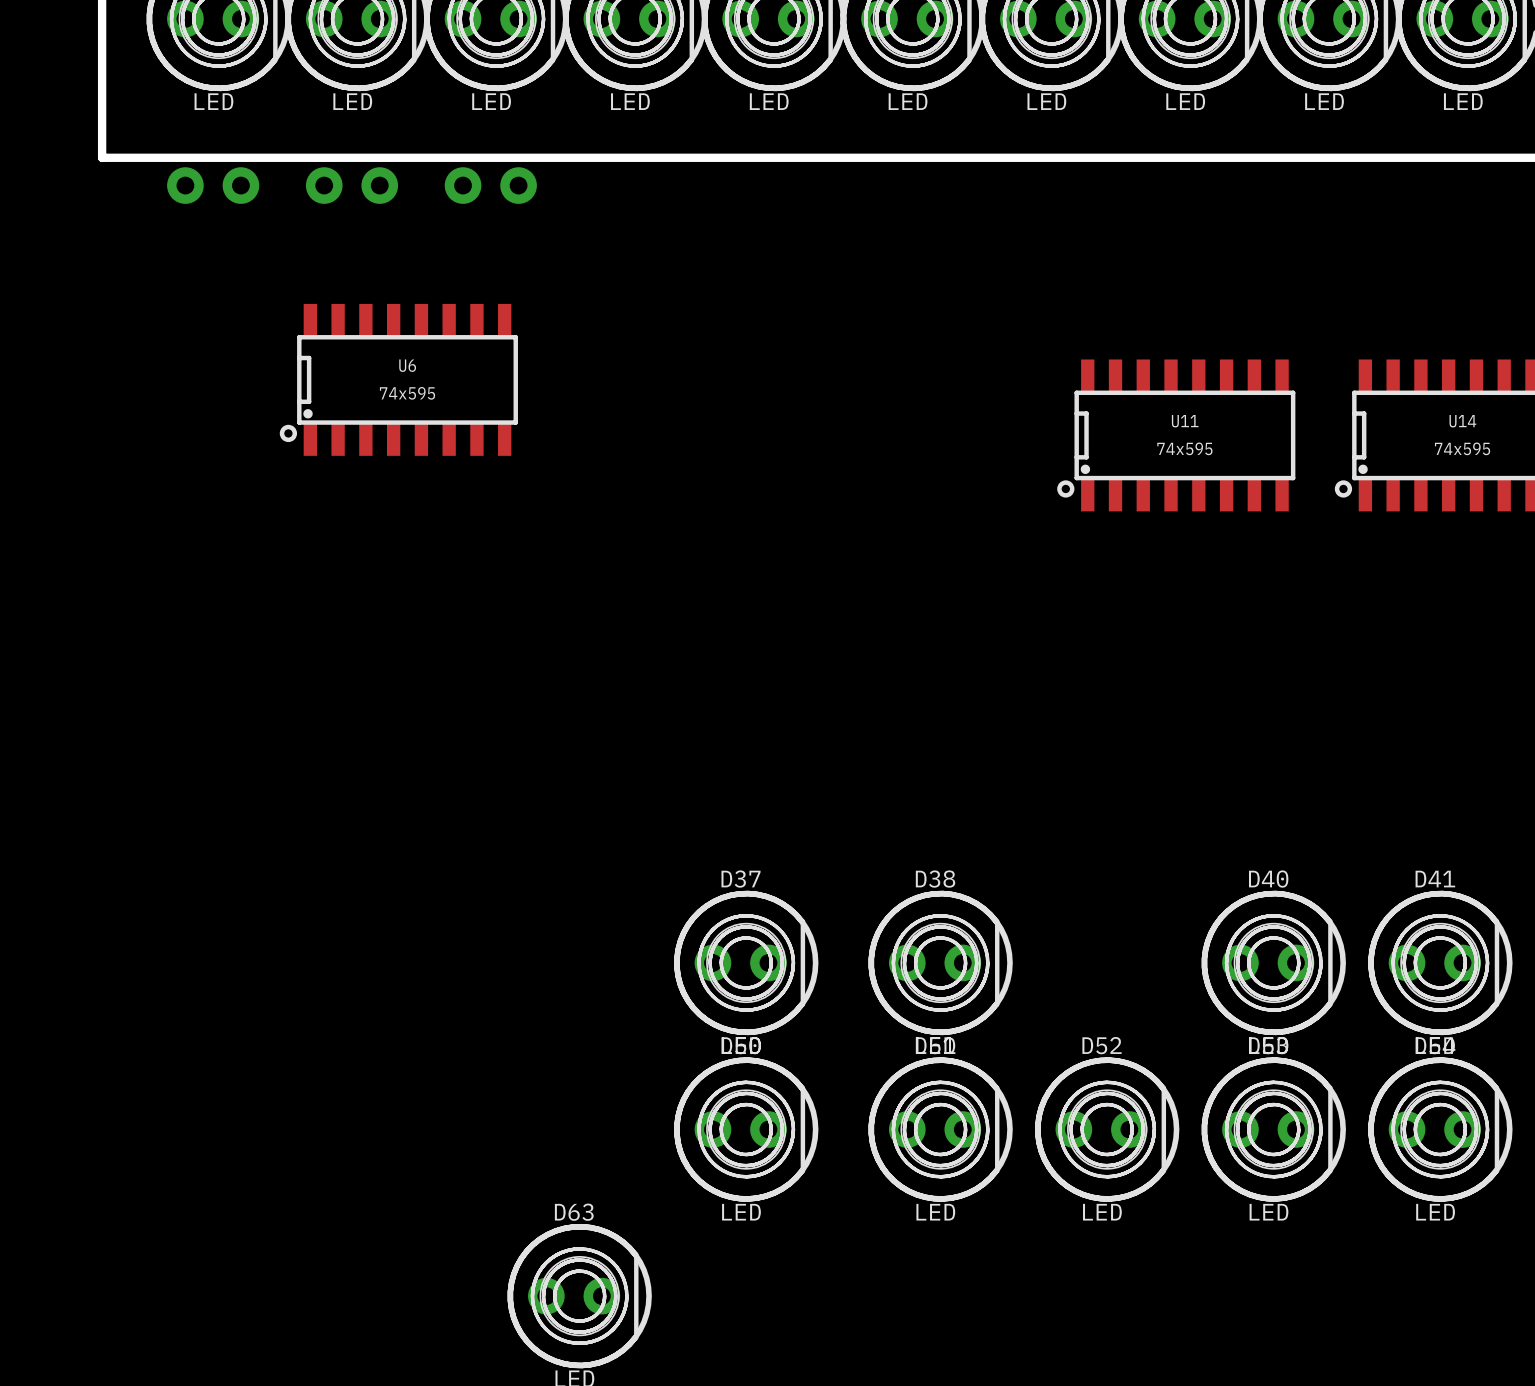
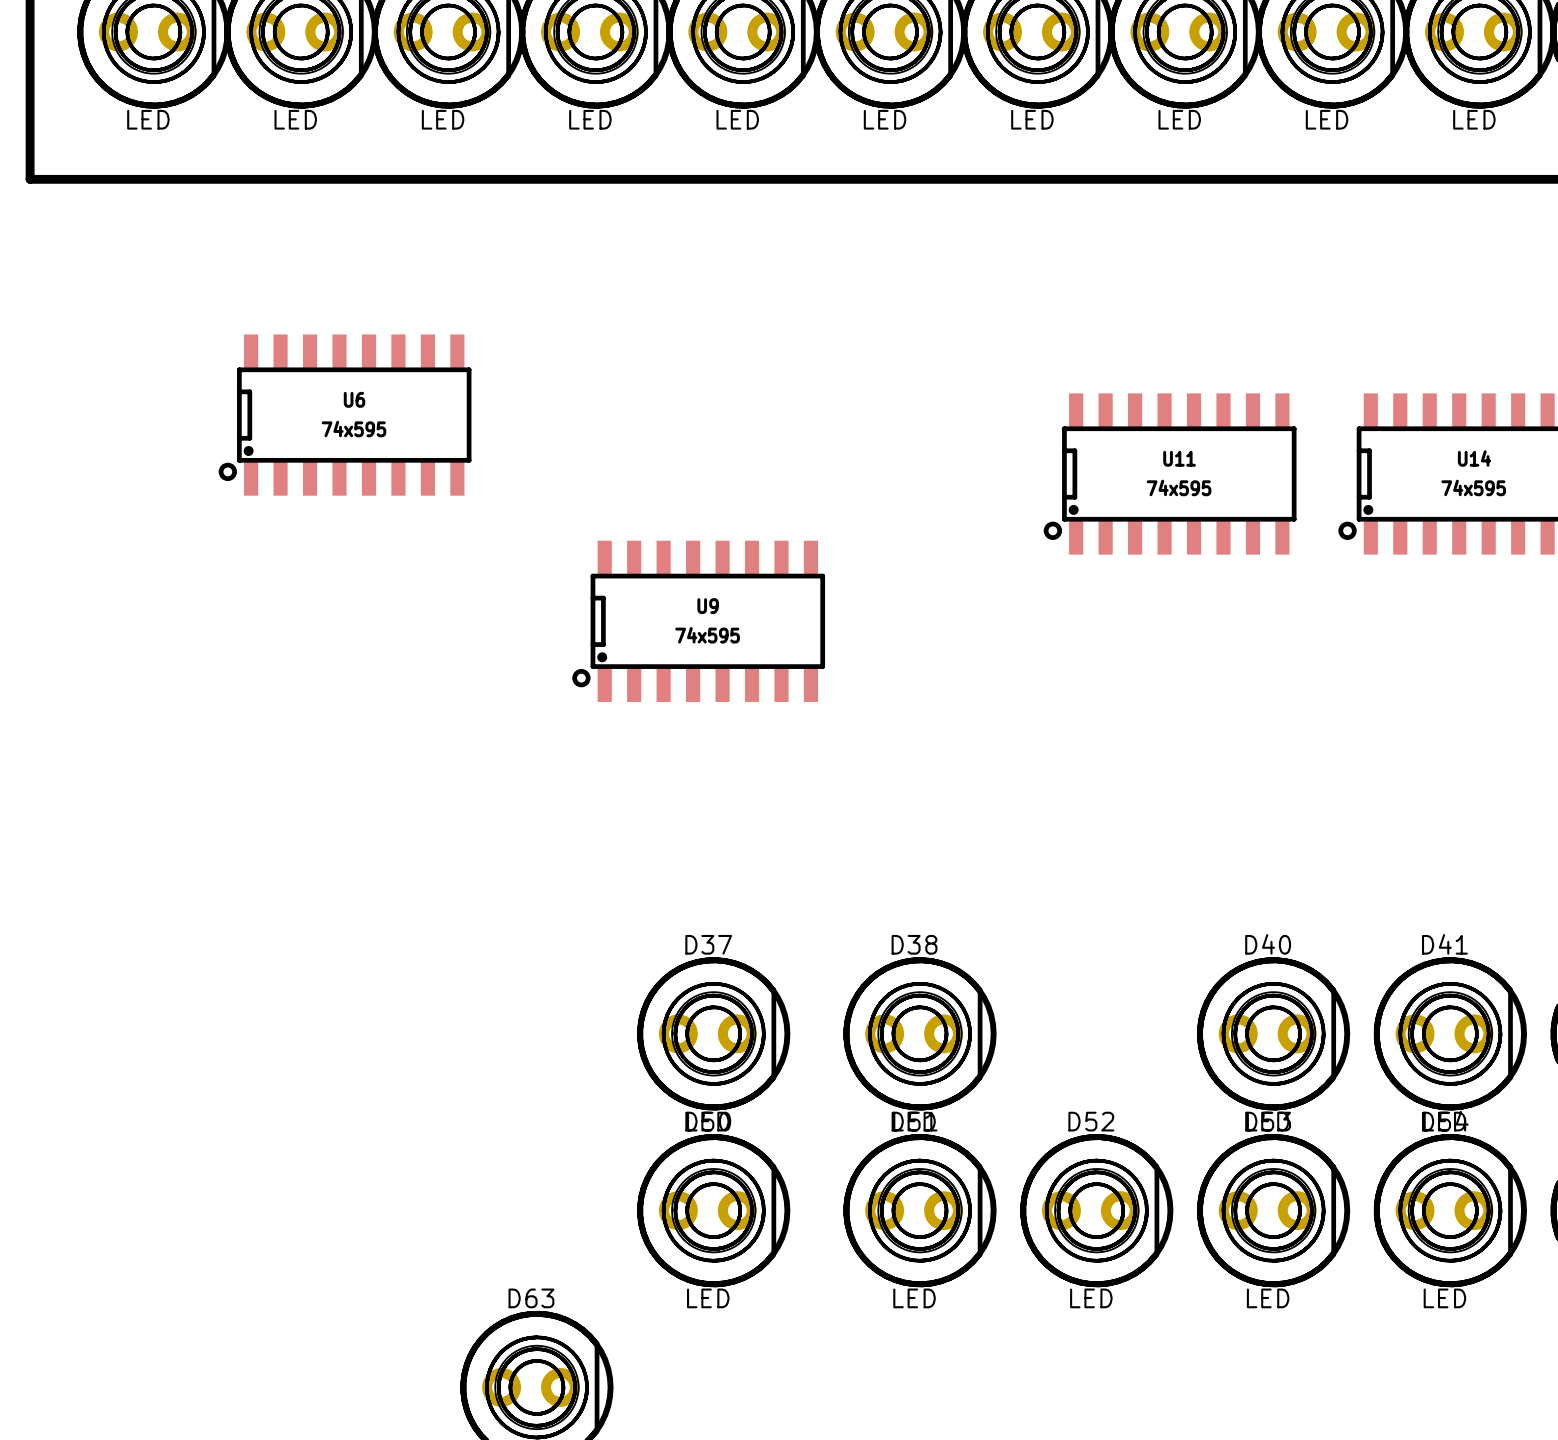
part: (213, 185) -> none
part: (351, 185) -> none
part: (490, 185) -> none
U9: none -> 74x595 (698, 621)

